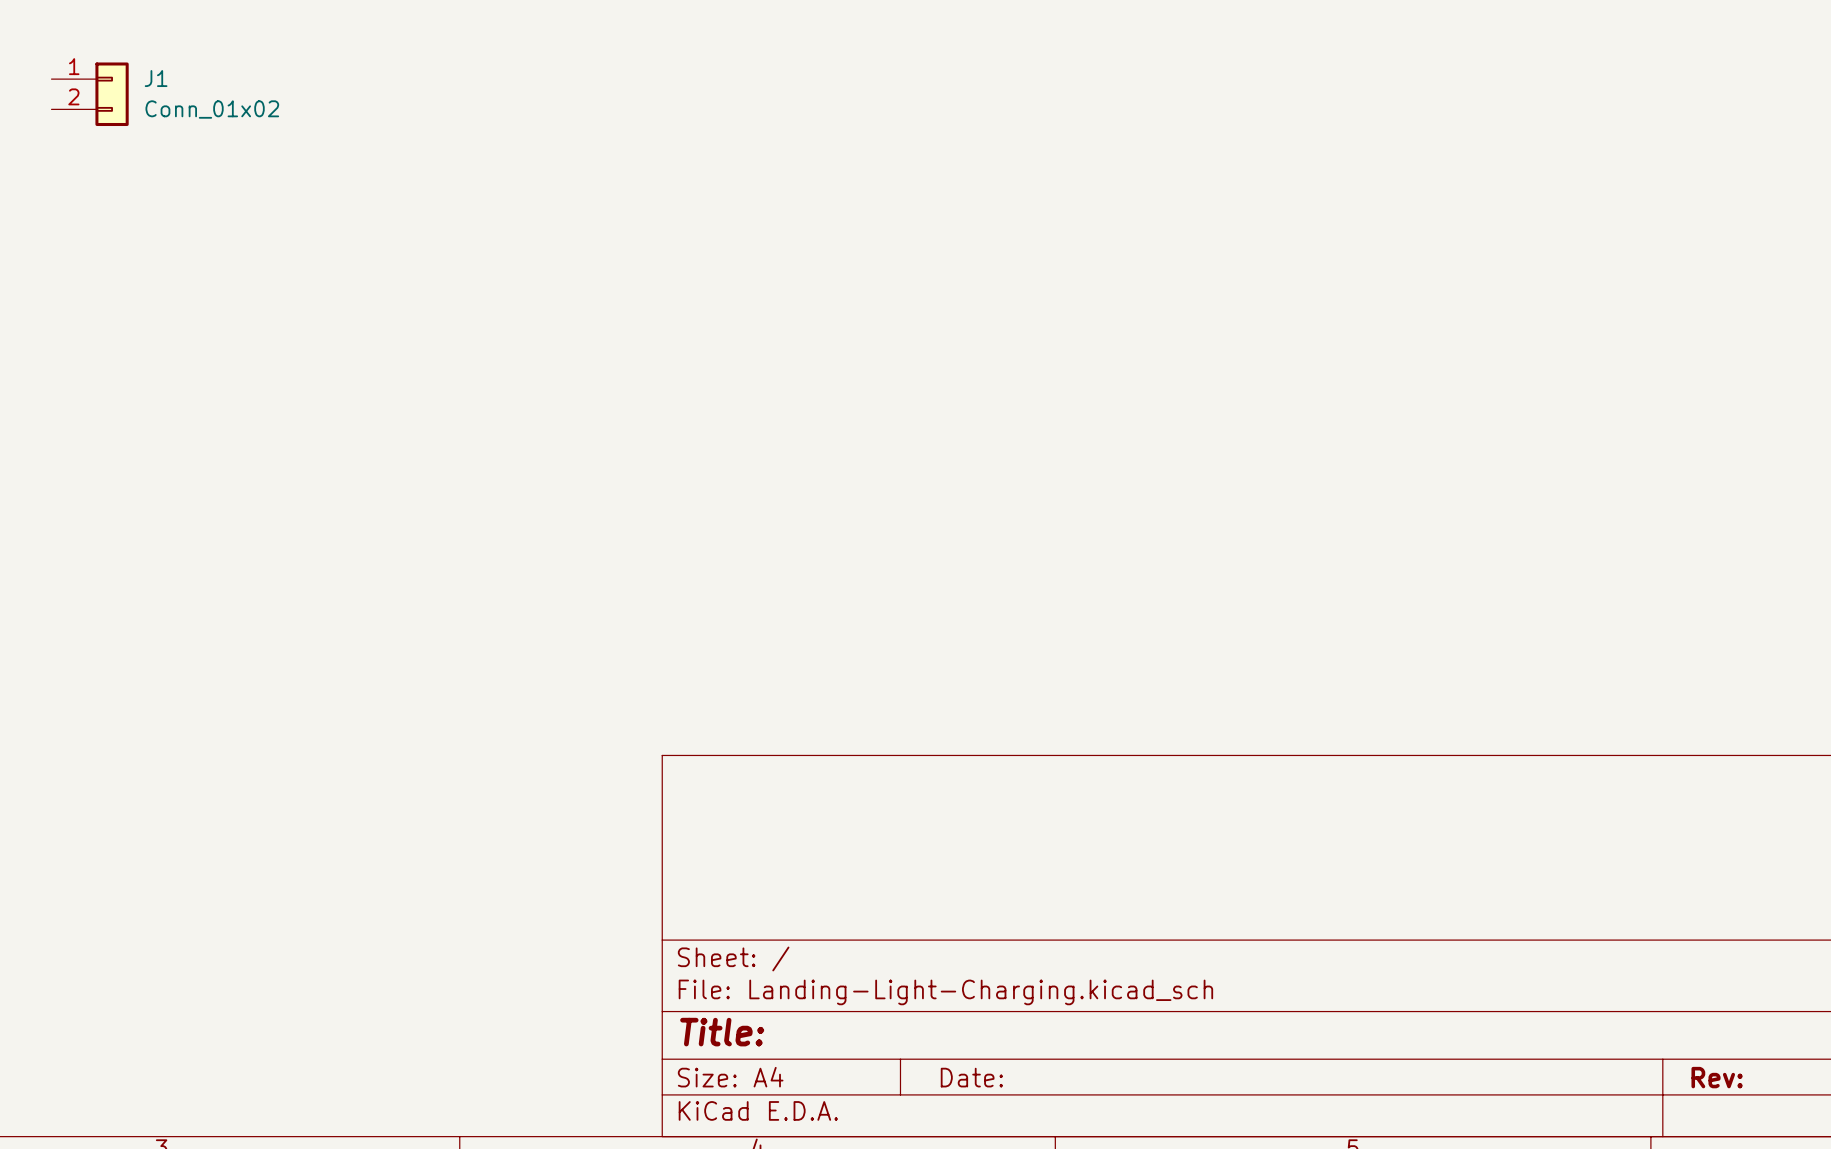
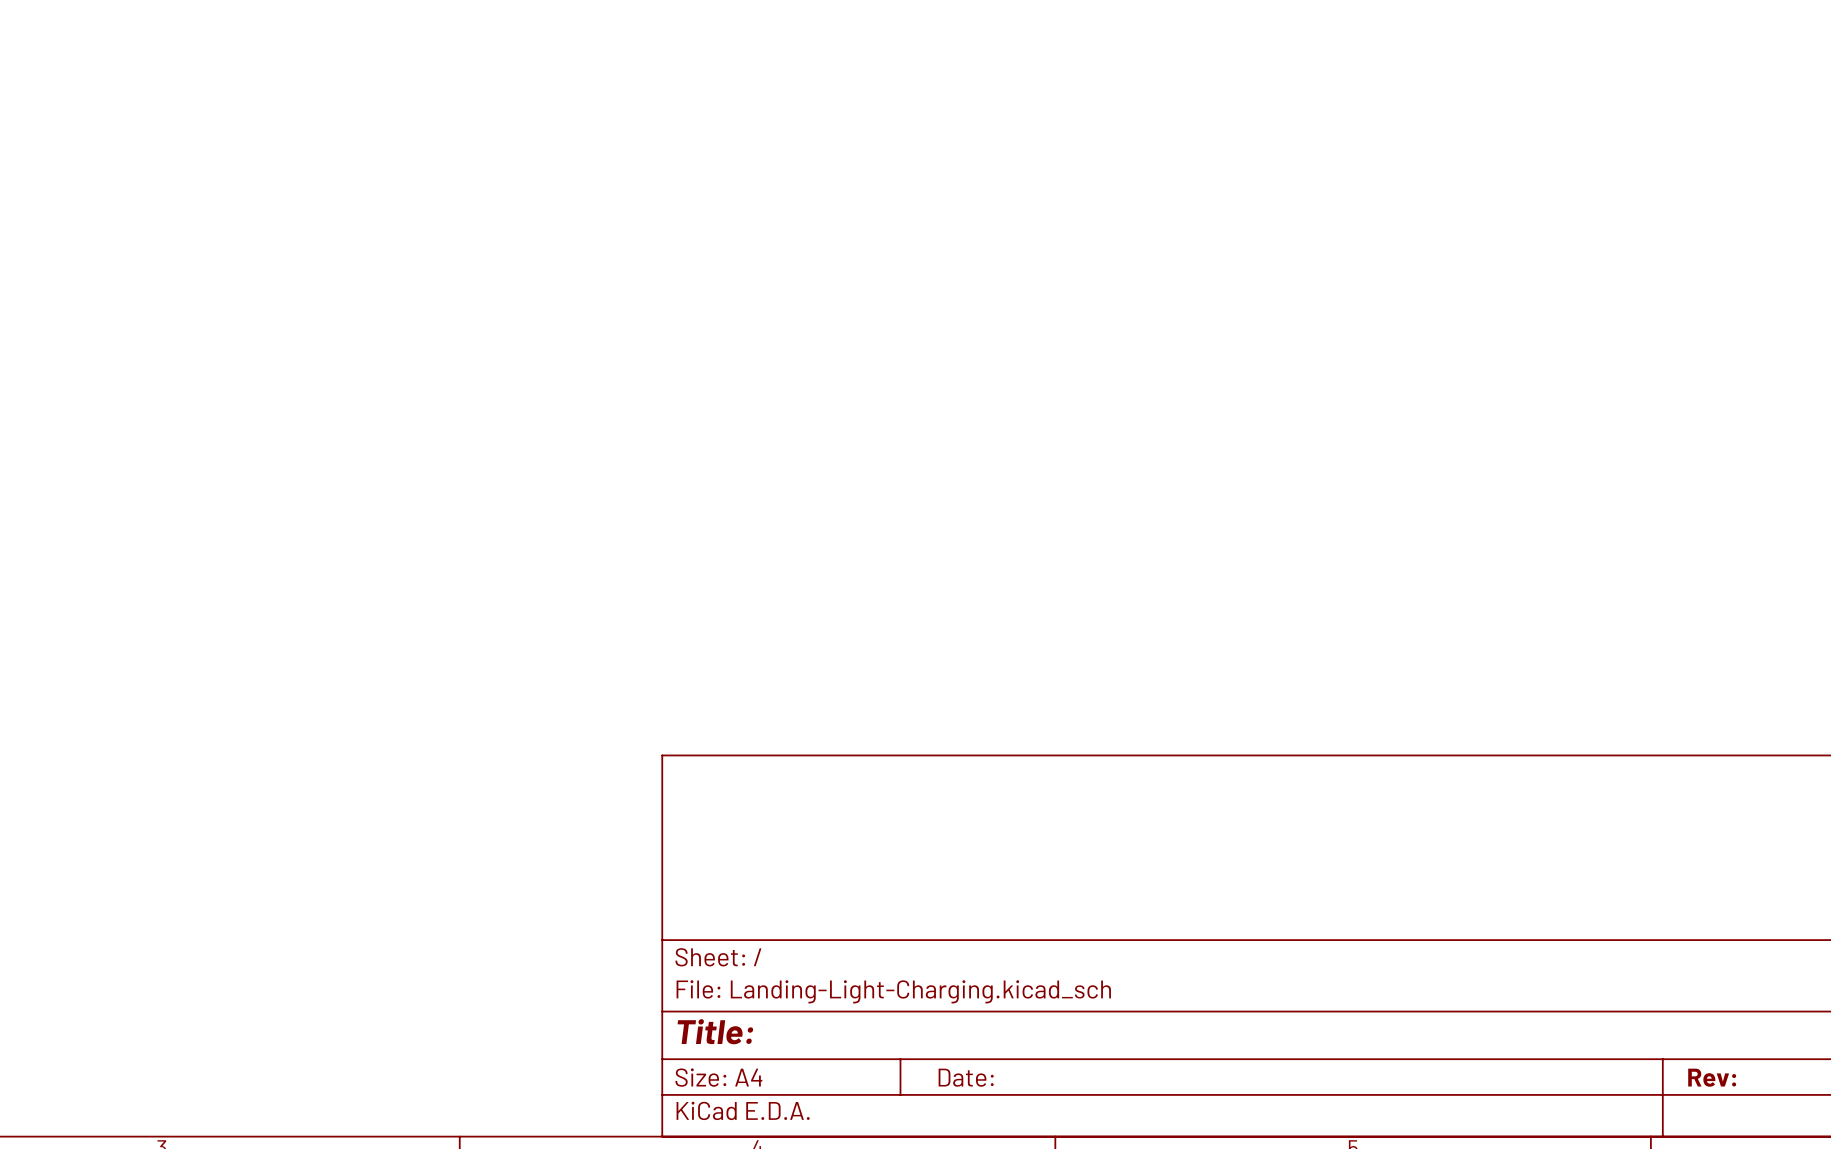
J1: Conn_01x02 (90, 94) -> none

